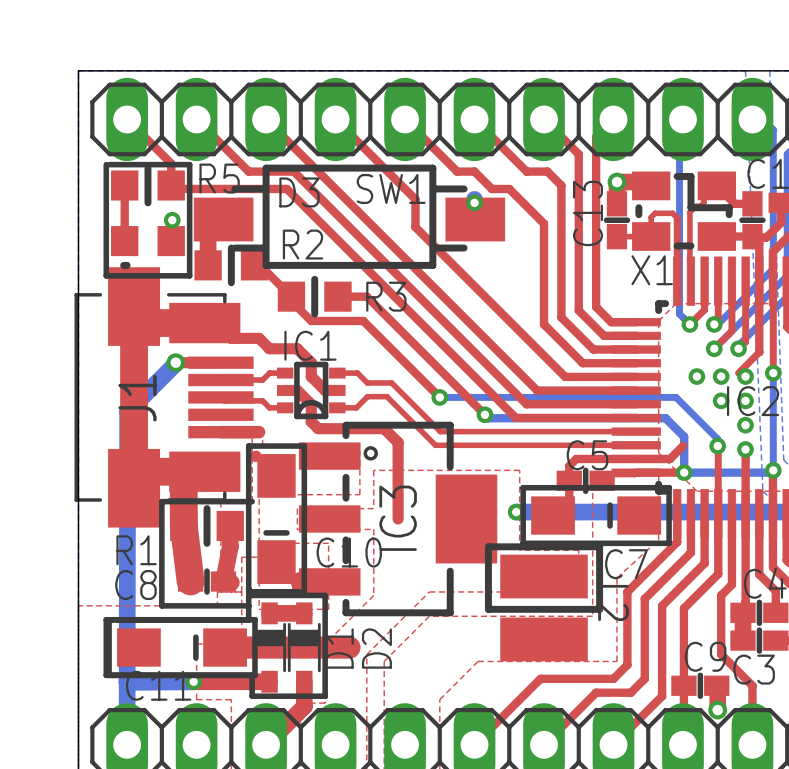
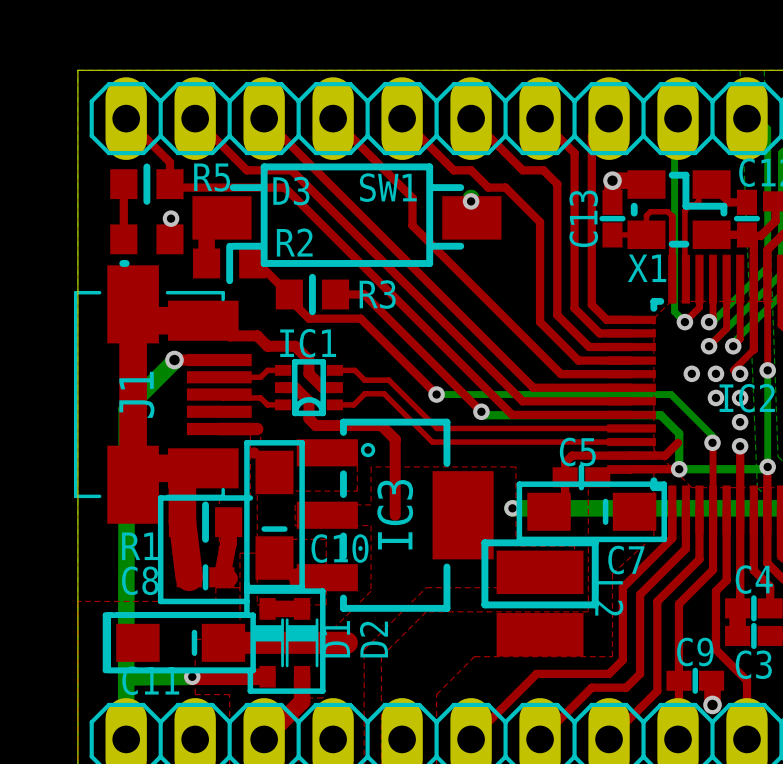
line: (106, 164) (106, 275) (189, 275) (189, 164) (109, 164) -> none

